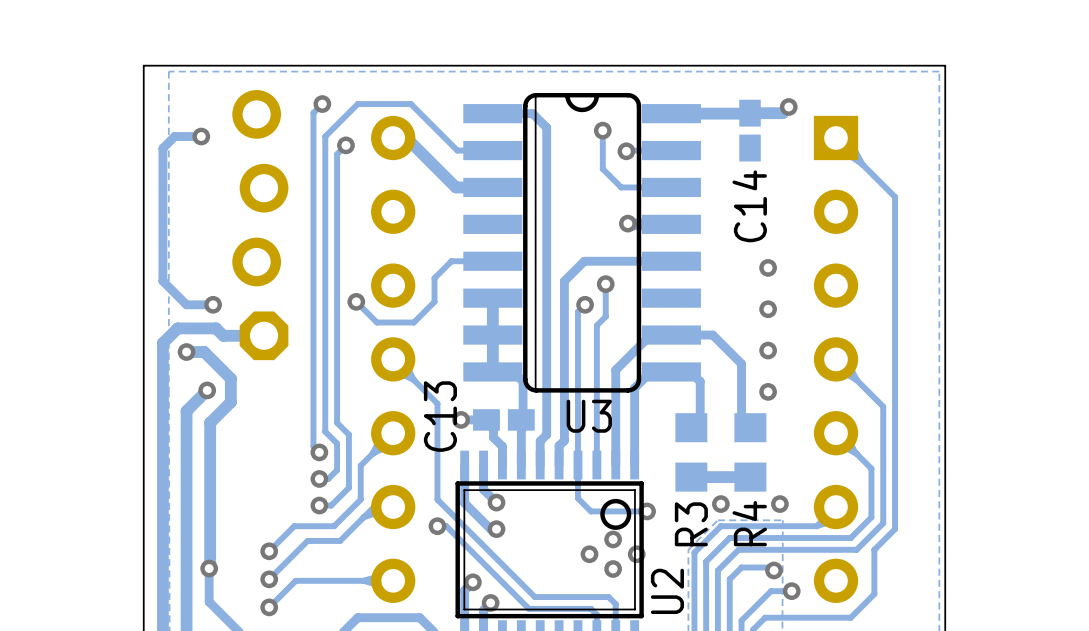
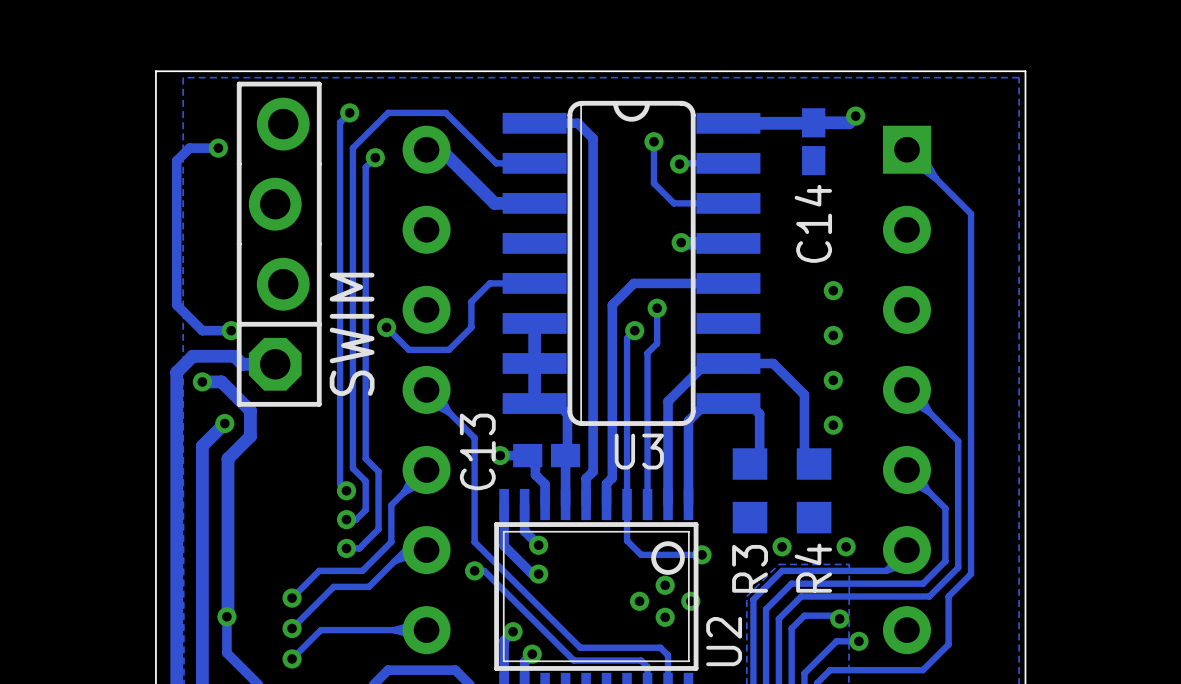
SWIM side: top (260, 225) -> bottom (279, 244)
track: (750, 477) (691, 477) -> none

